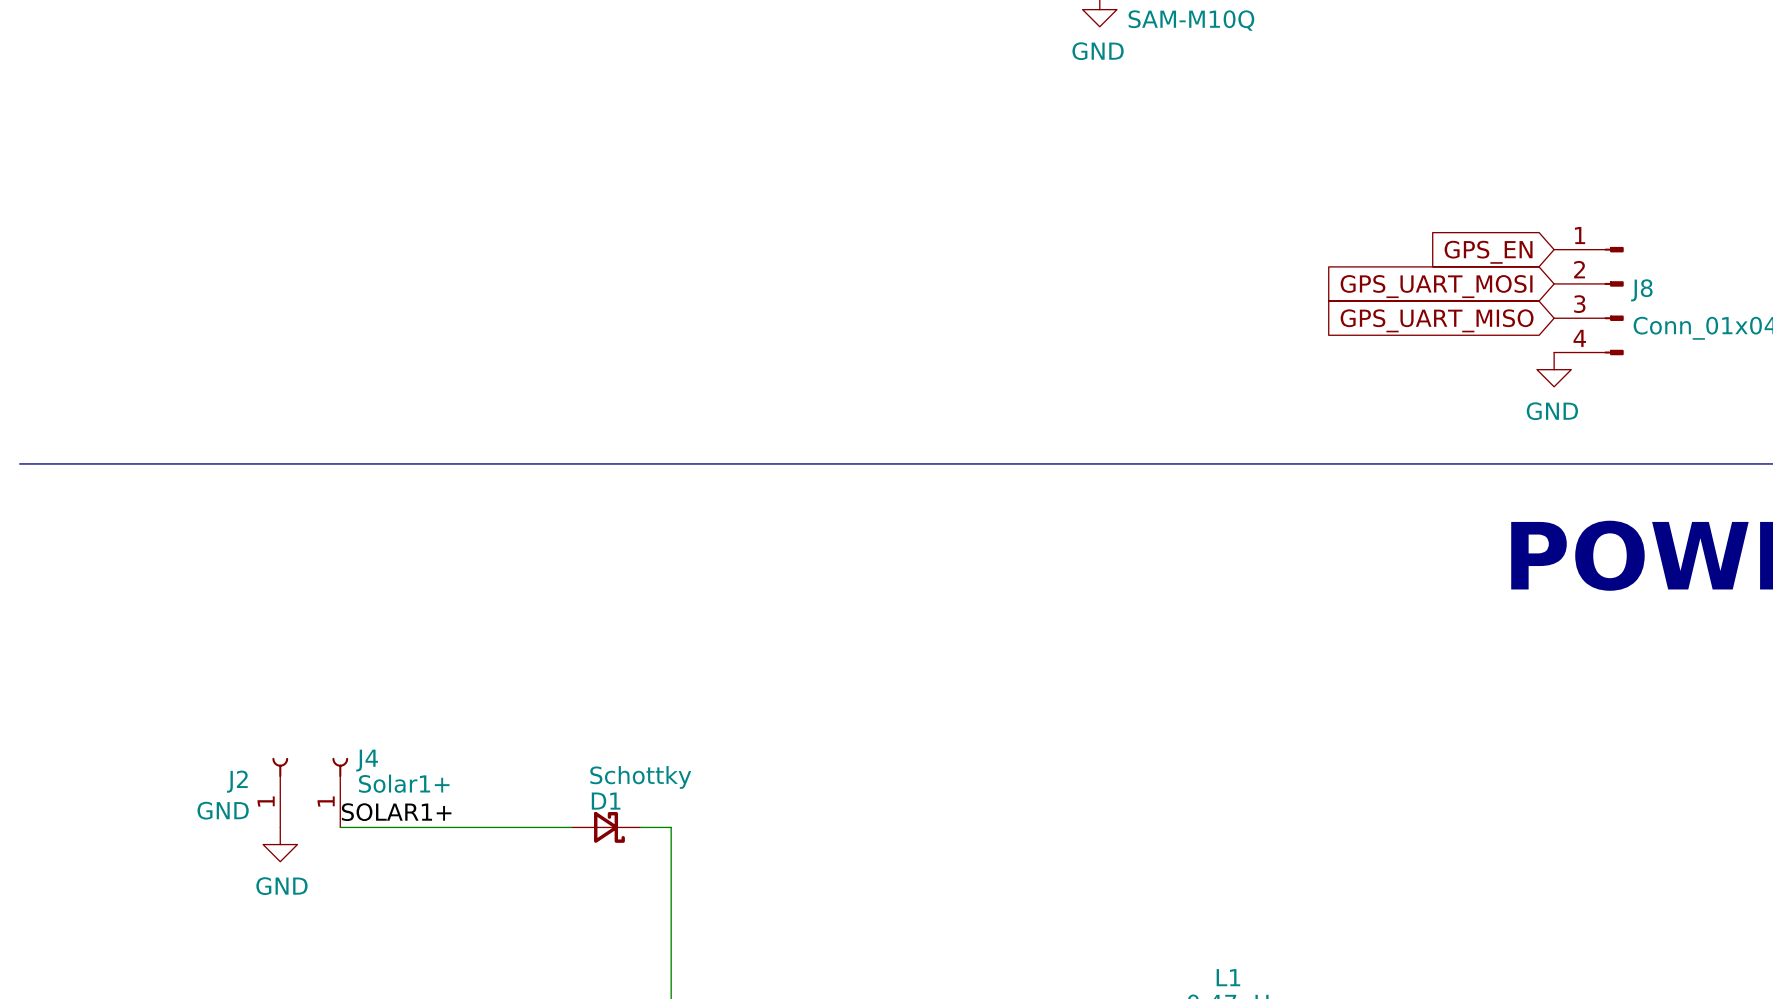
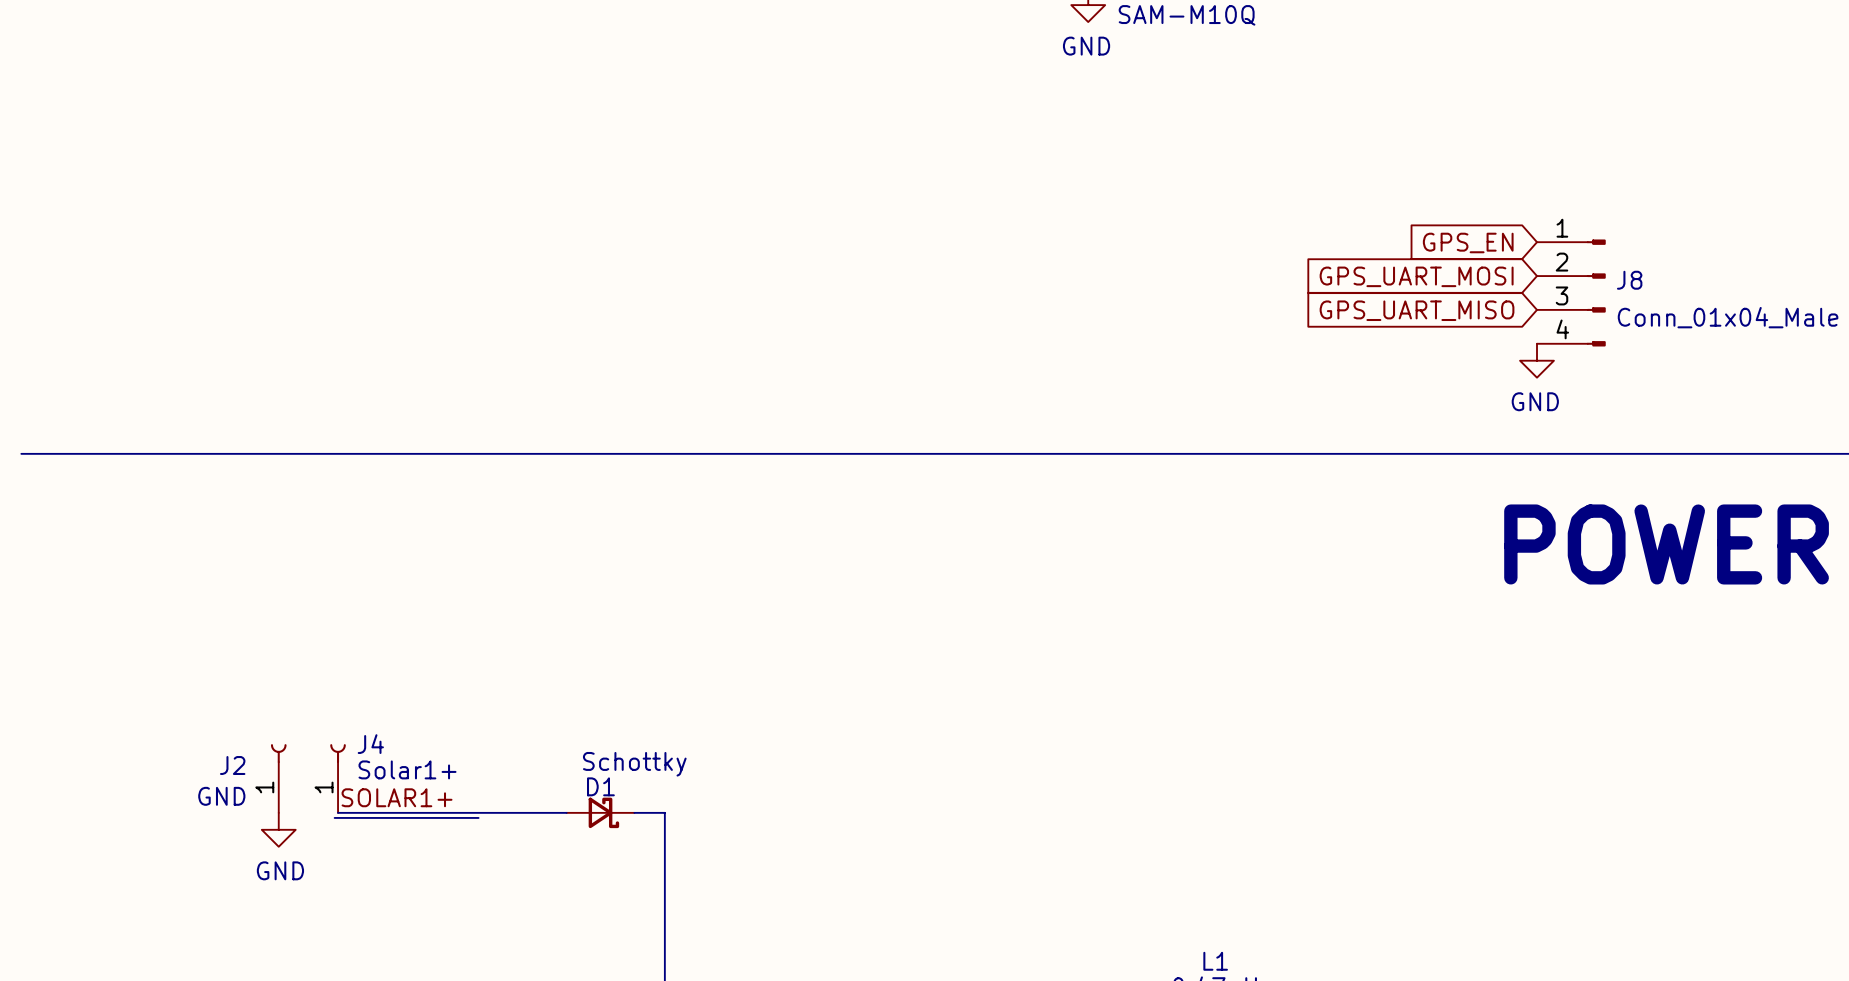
wire: none -> (334, 817) (478, 817)

